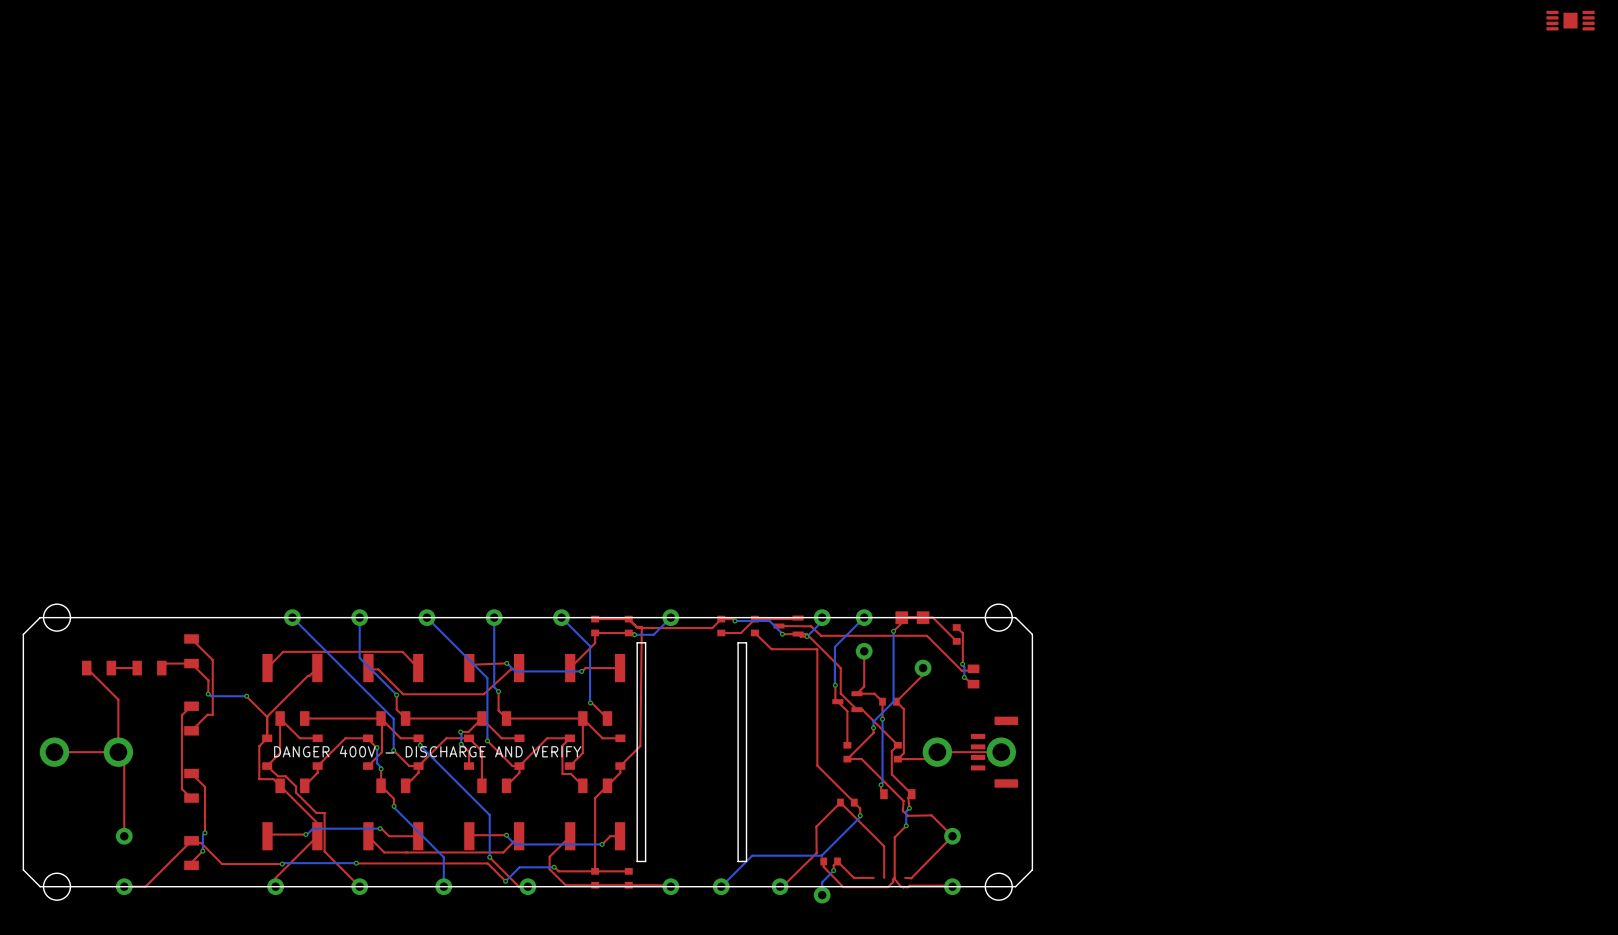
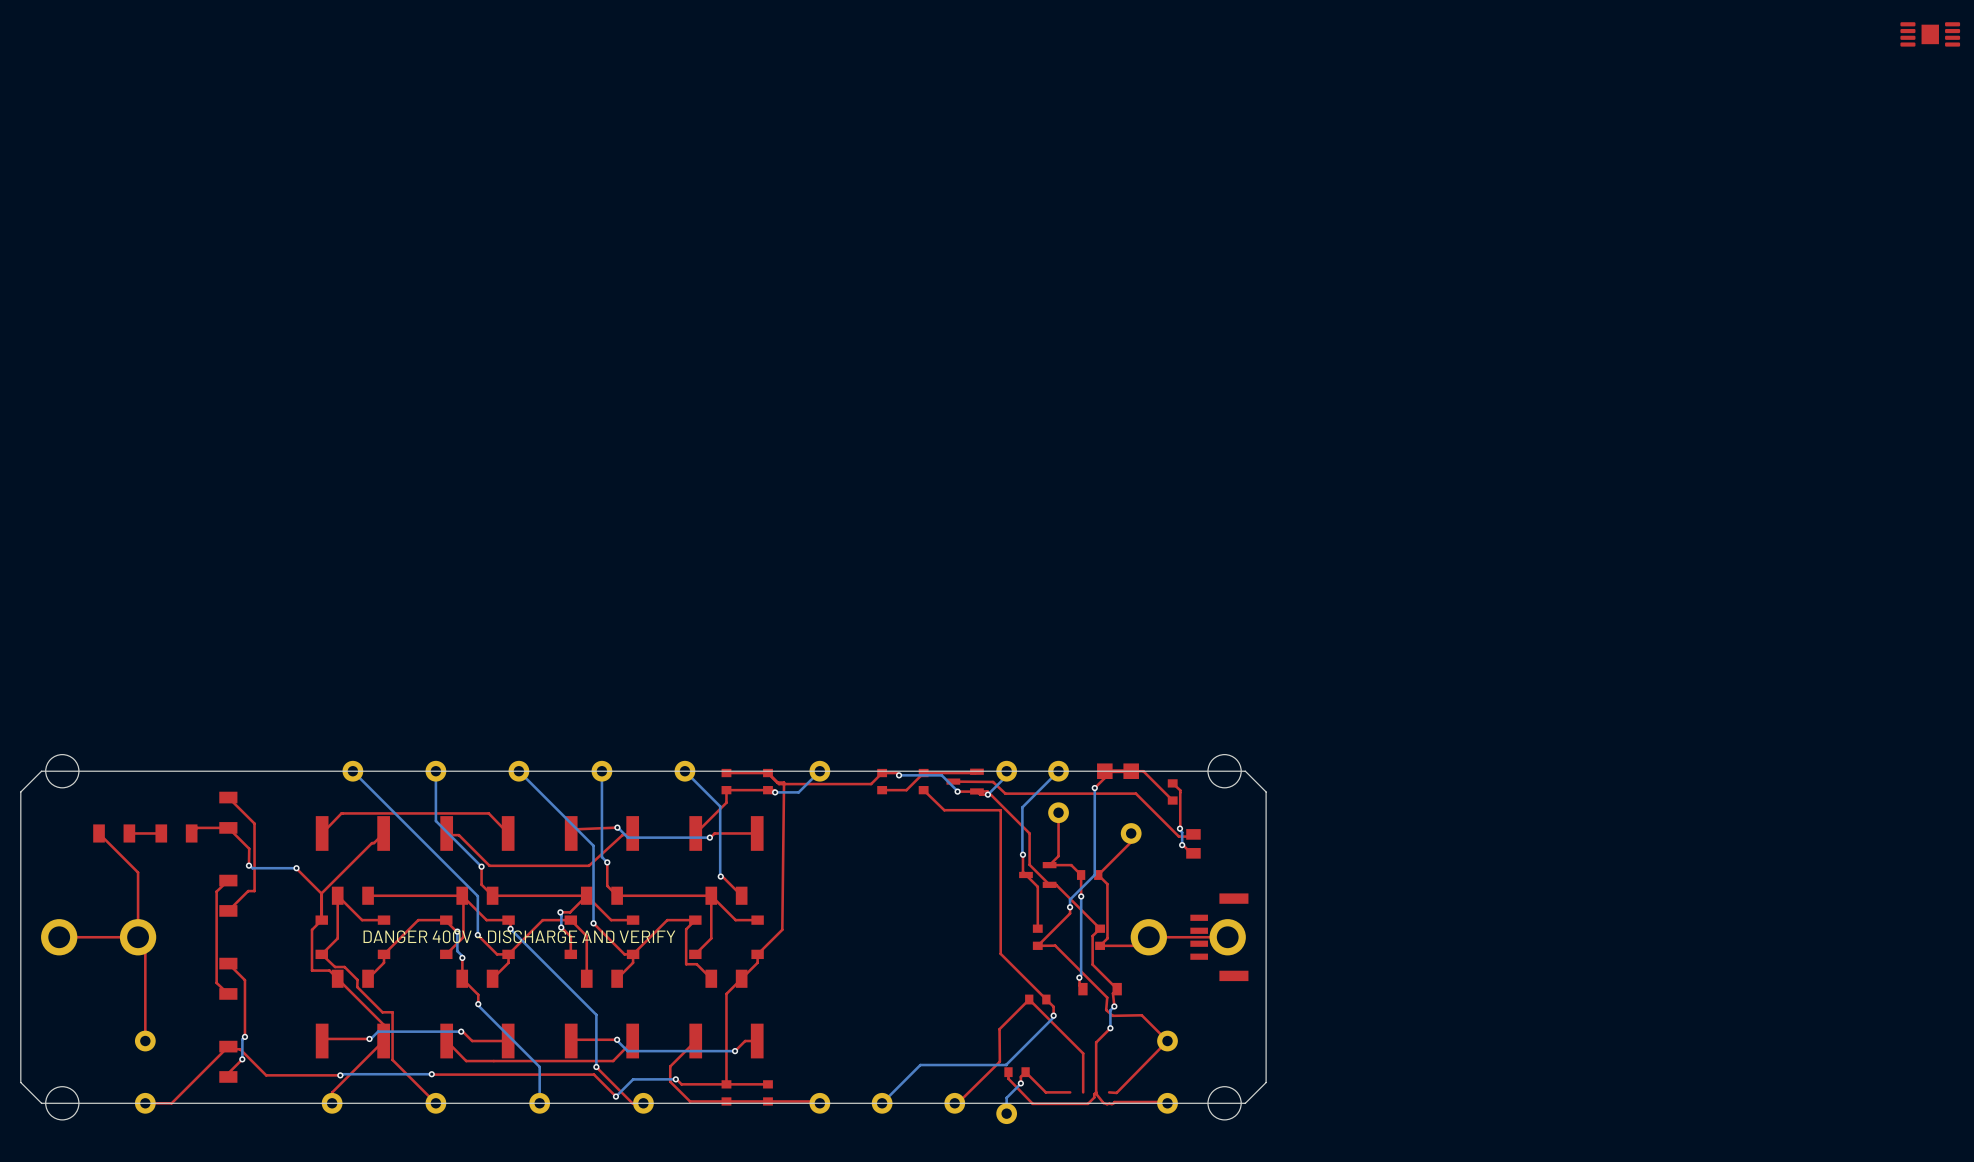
board edge: (645, 642) (637, 642) (637, 861) (645, 861) (645, 642) -> none
board edge: (746, 642) (738, 642) (738, 861) (746, 861) (746, 642) -> none

